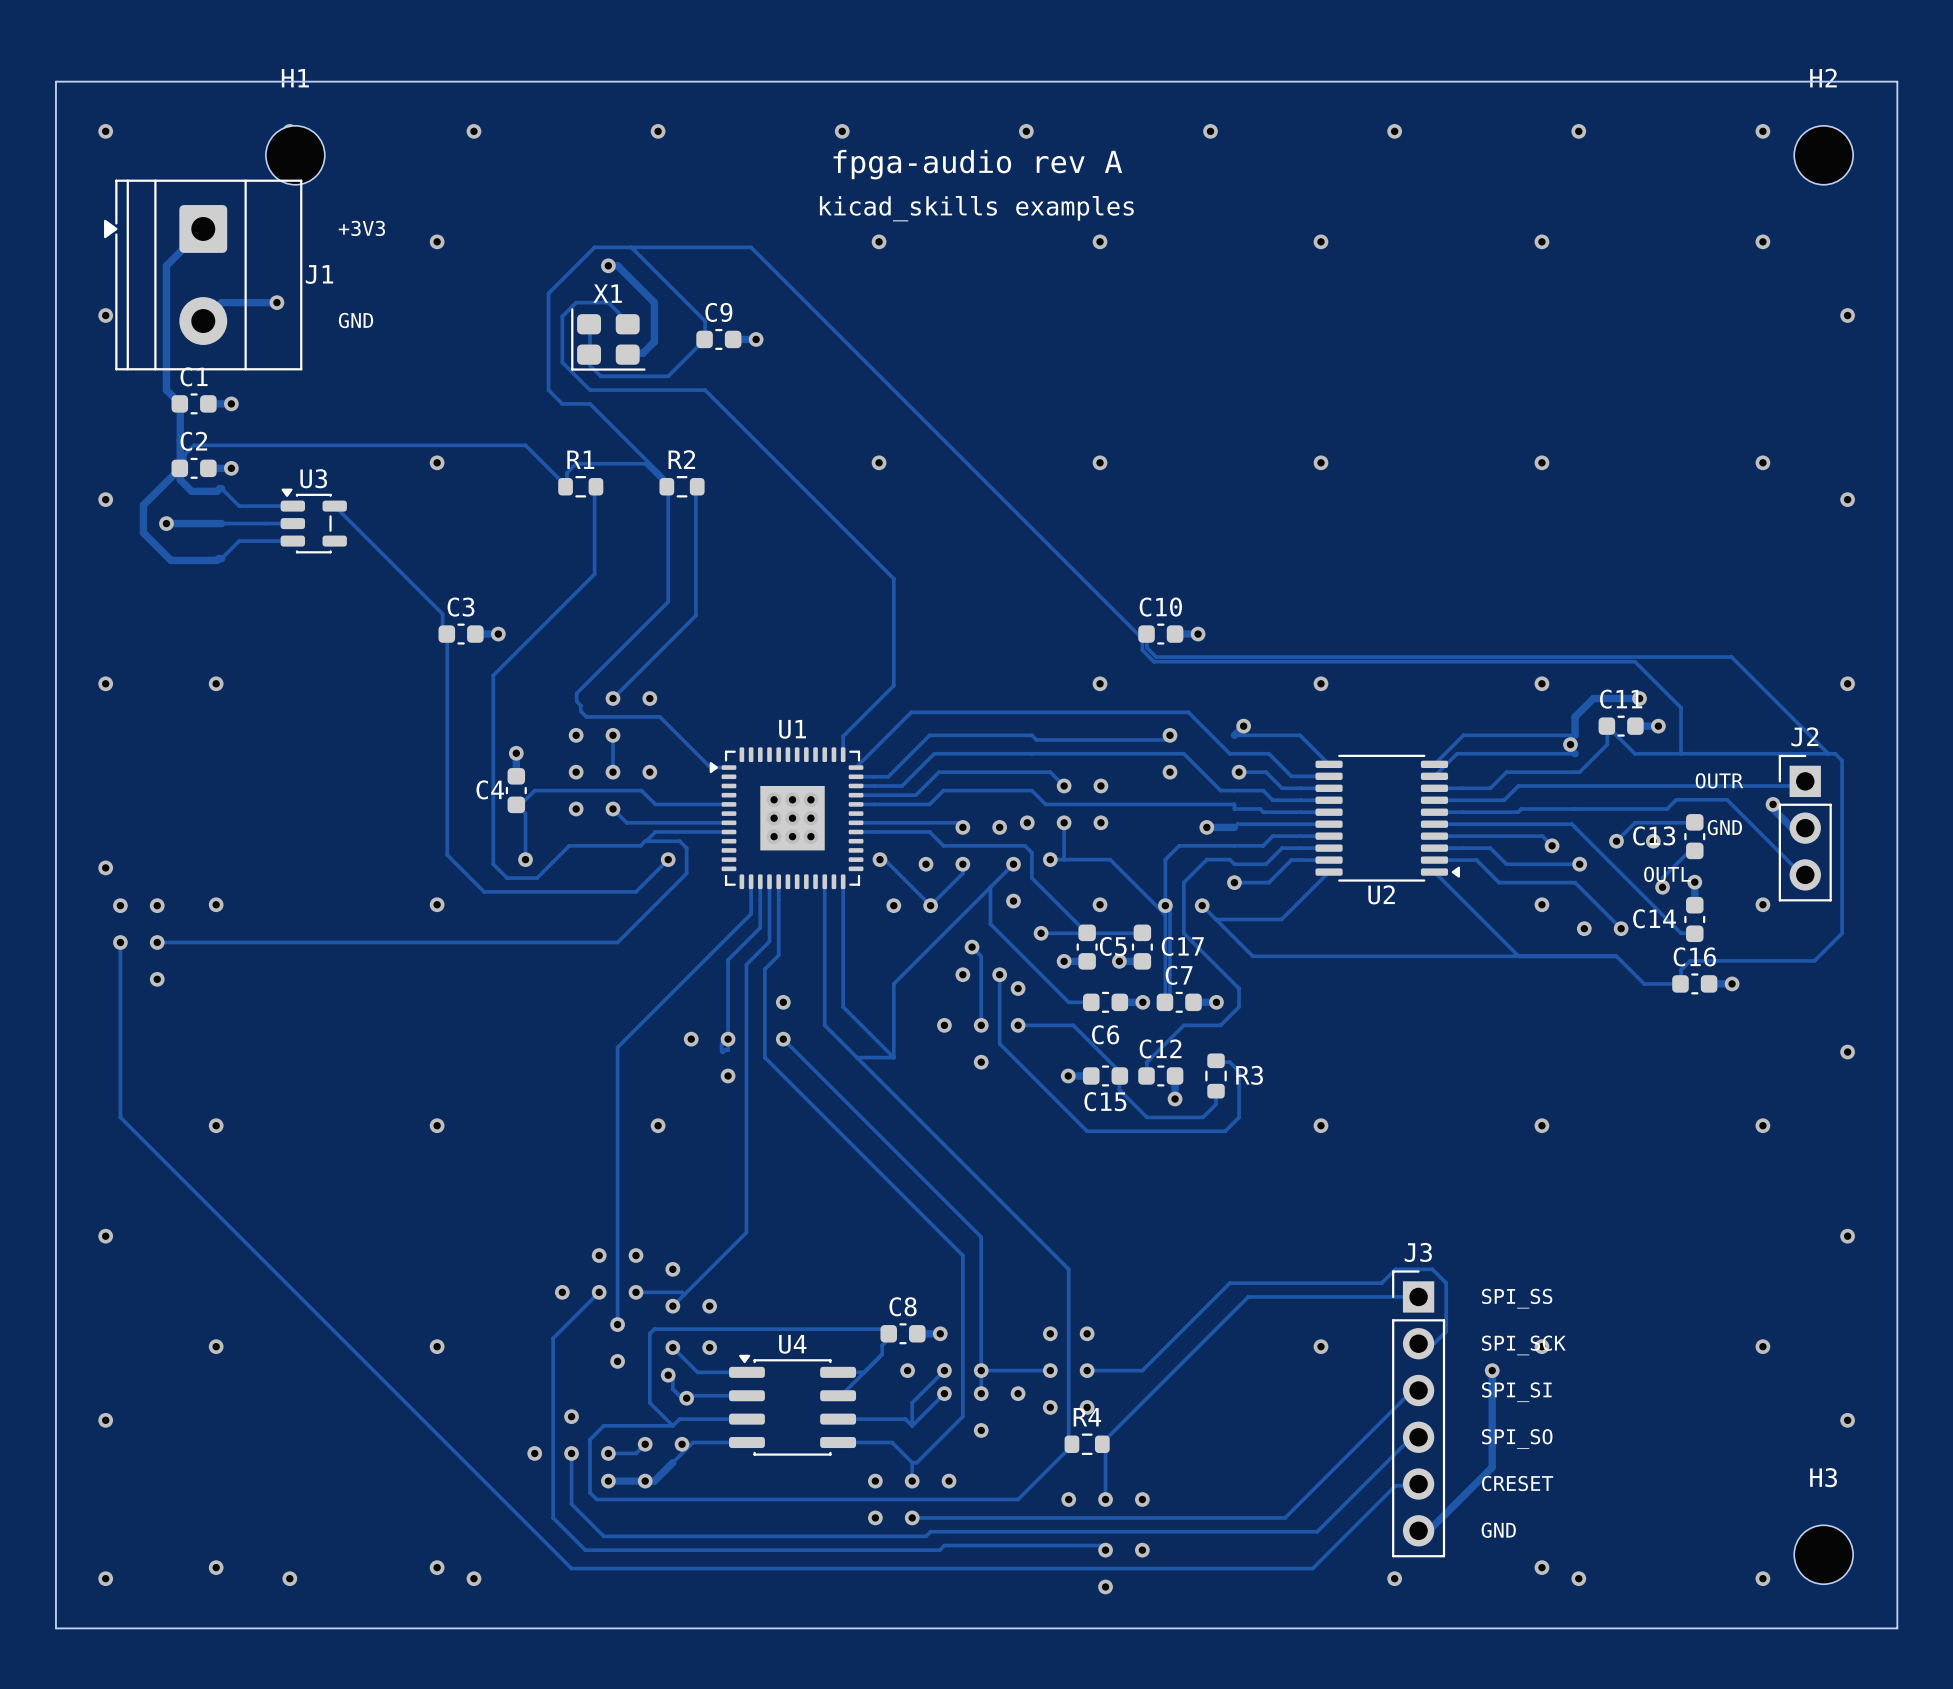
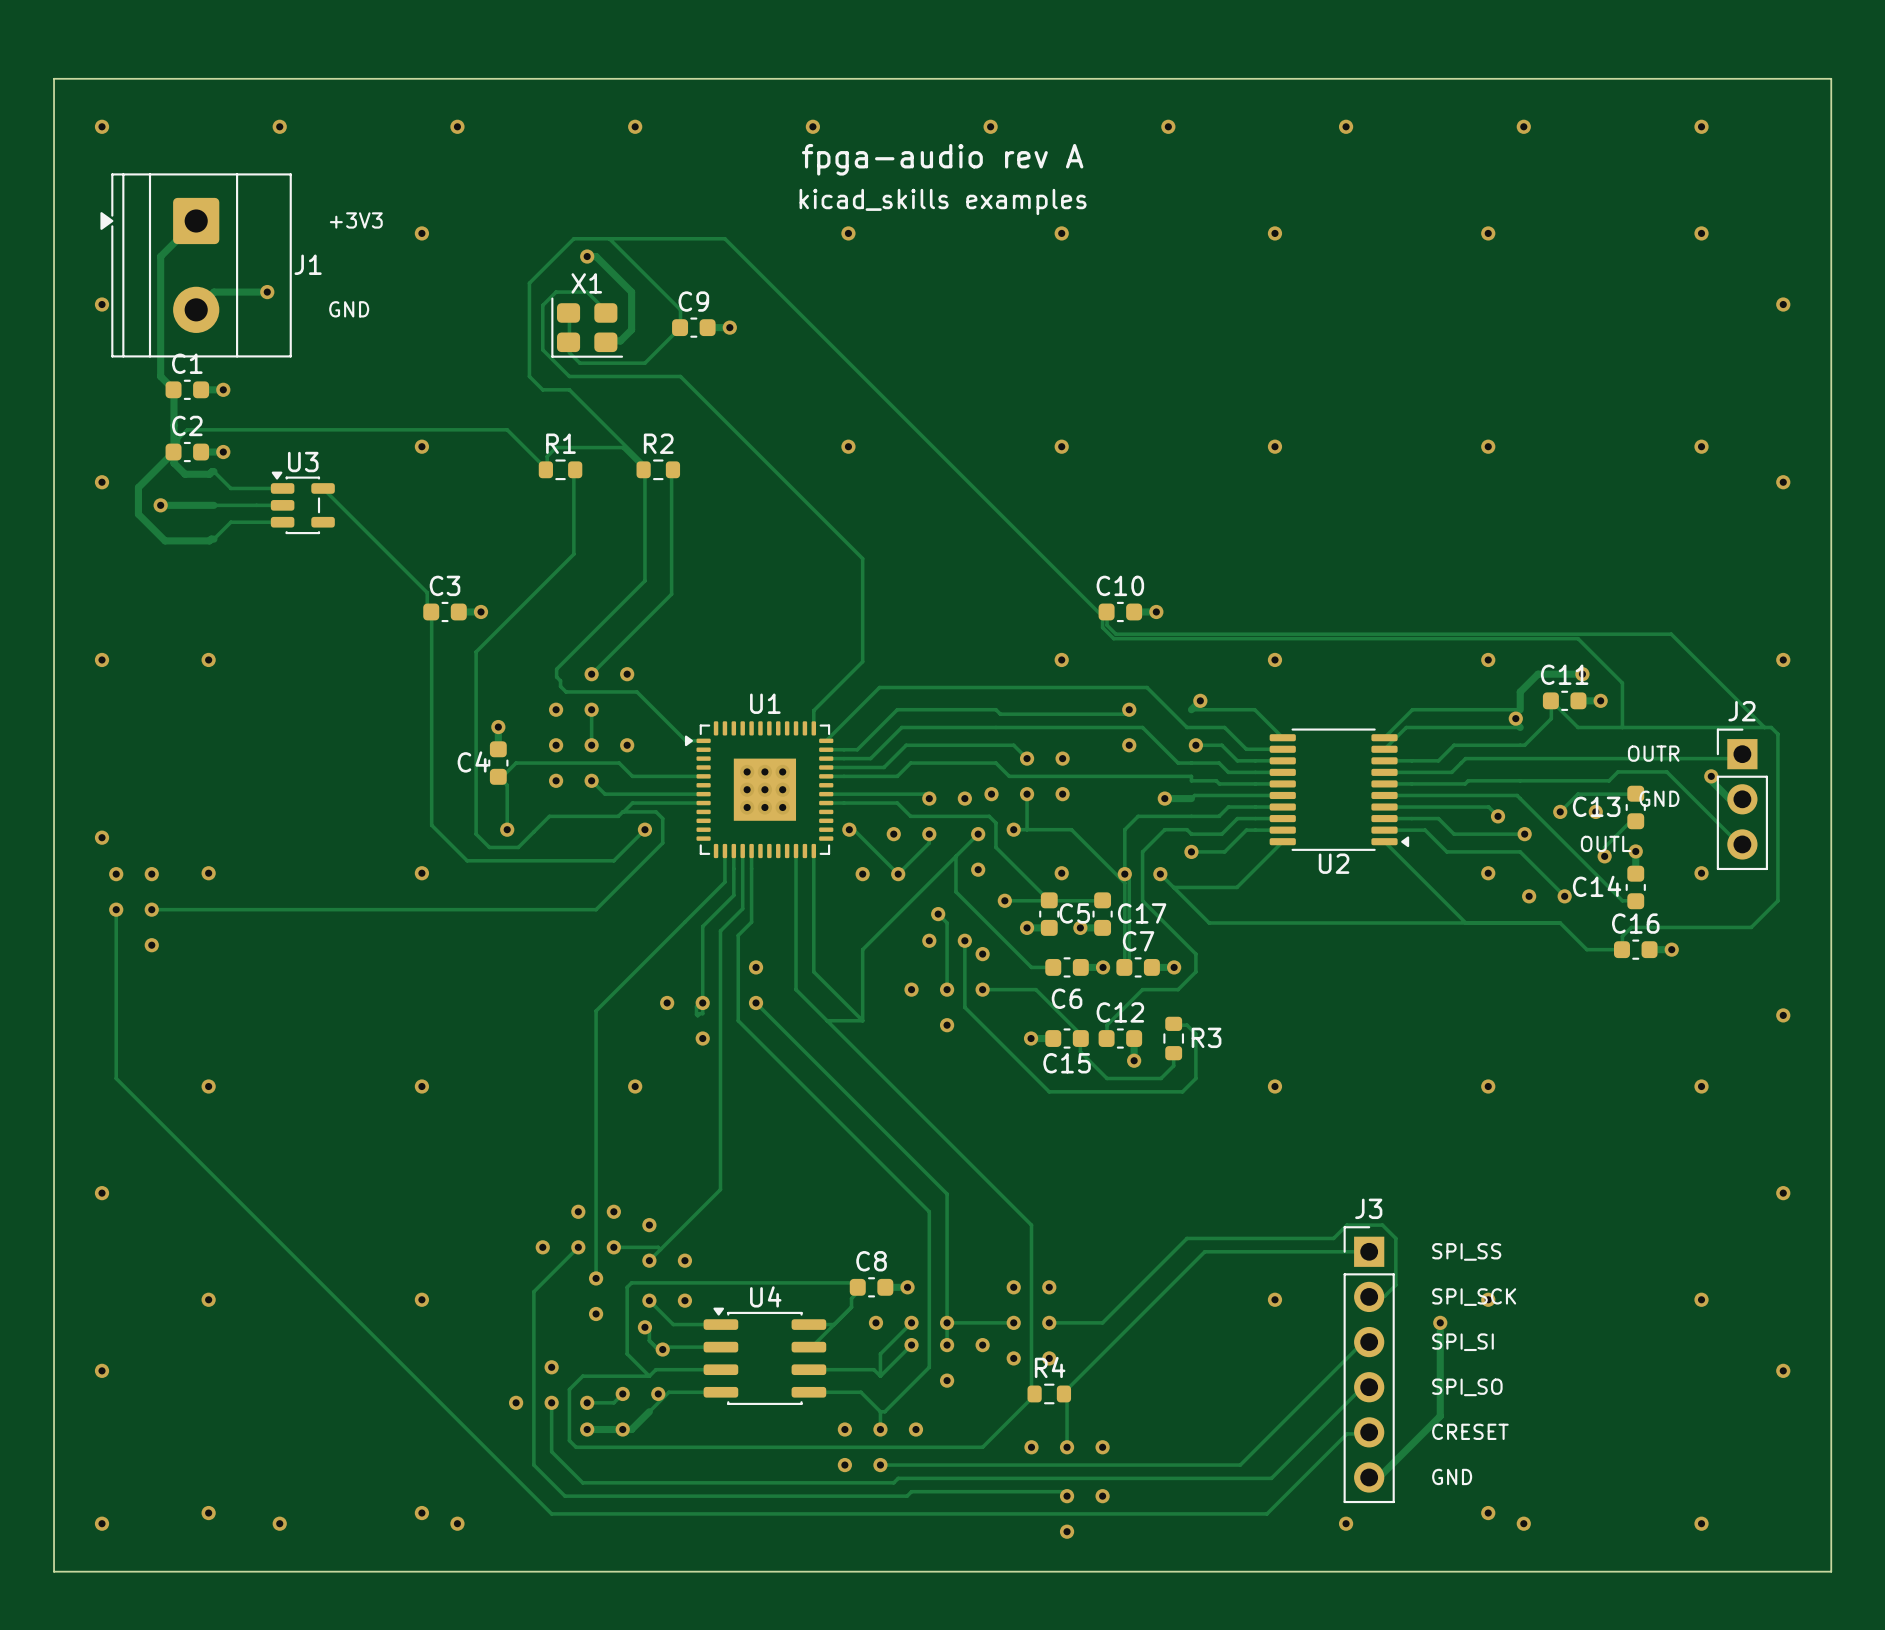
H1: (295, 155) -> none
H2: (1823, 155) -> none
H3: (1823, 1554) -> none

